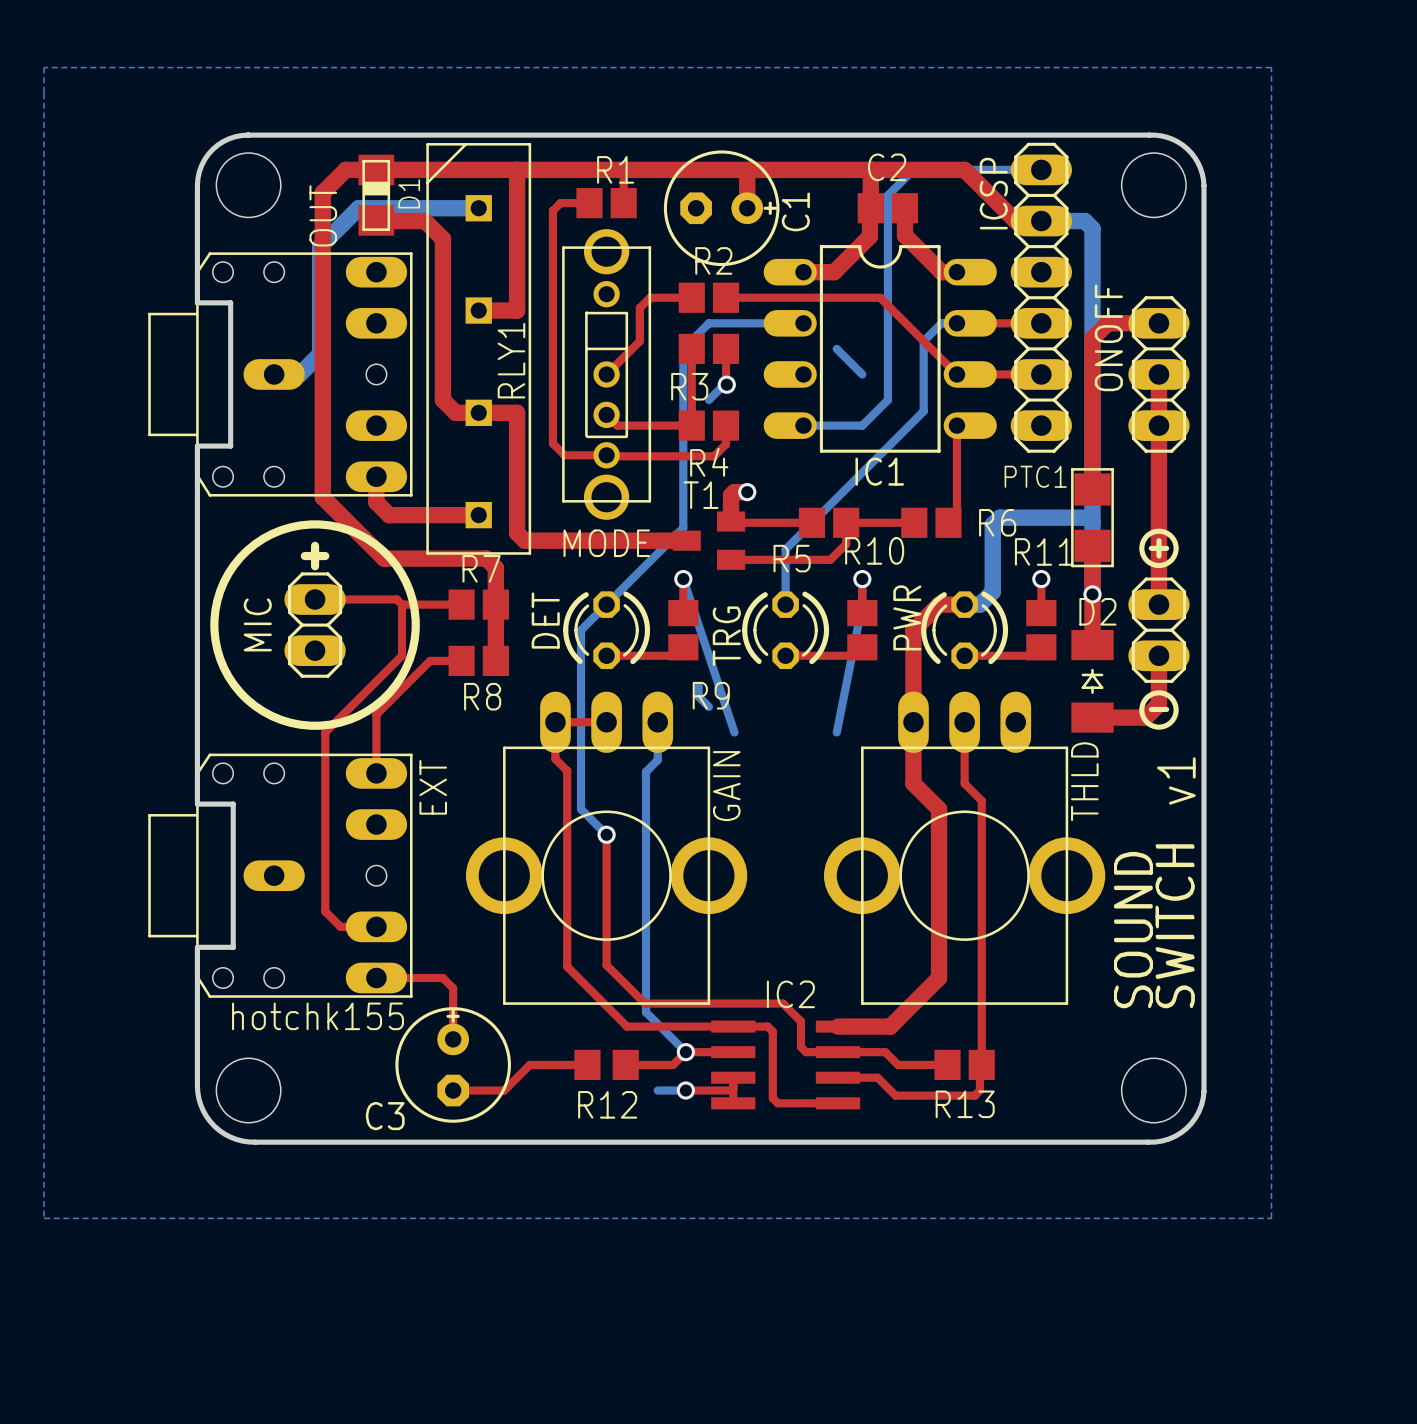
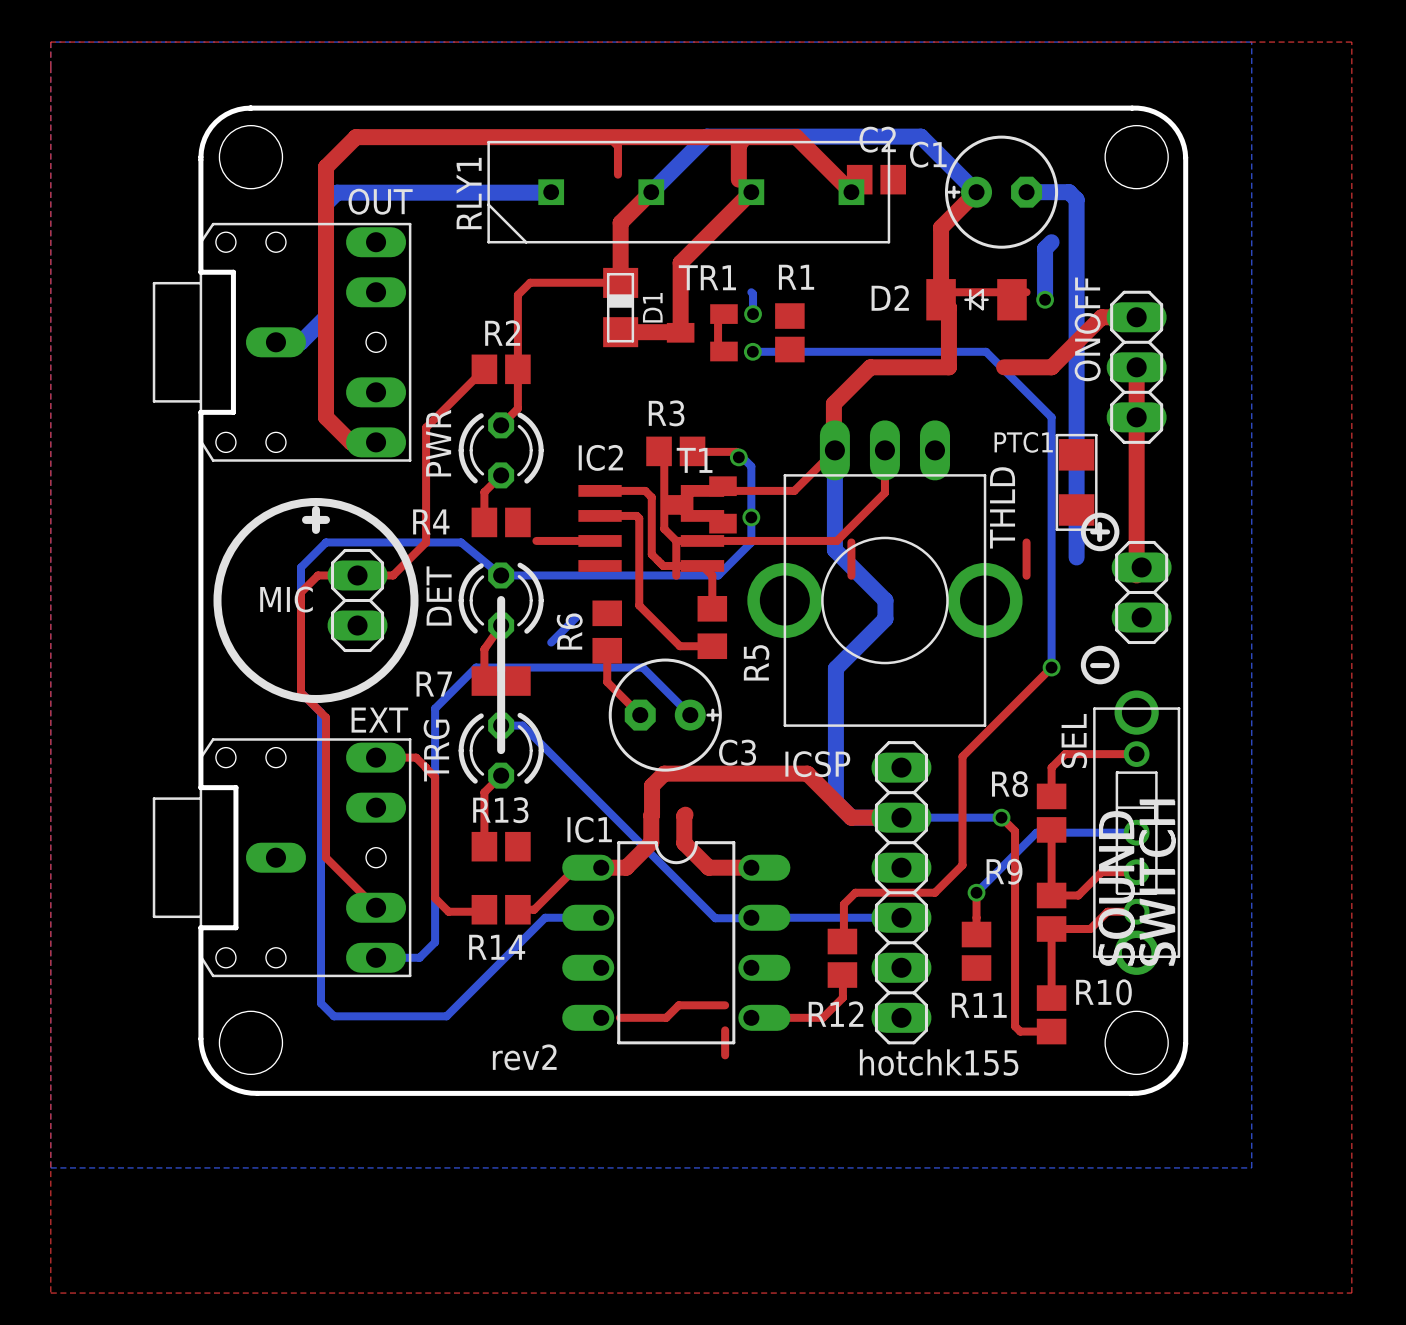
top zone outline: none -> (50, 42) (50, 1293) (1351, 1293) (1351, 42) (50, 42)
top track: (517, 169) (517, 310) (478, 310) -> none
top track: (872, 169) (870, 171) (870, 236) (834, 272) (803, 272) -> none
bottom track: (1041, 169) (913, 169) (887, 195) (887, 400) (862, 425) (803, 425) -> none
D1 position: (376, 195) -> (620, 307)
top track: (589, 203) (560, 203) (552, 210) (552, 443) (564, 455) (714, 456) (726, 444) (726, 425) -> none
R1 rotation: 0° (606, 203) -> 90° clockwise (789, 332)
R1 position: (606, 203) -> (789, 332)
bottom track: (478, 208) (358, 208) (320, 246) (320, 354) -> (551, 192) (337, 192) (326, 203) (326, 317) (321, 322)
C1 rotation: 0° (721, 208) -> 180° (1001, 192)
C1 position: (721, 208) -> (1001, 192)
top track: (905, 208) (905, 235) (941, 272) (956, 272) -> none
OUT name rotation: 0° (323, 215) -> 90° clockwise (380, 201)
top track: (376, 220) (425, 221) (442, 238) (442, 400) (455, 412) (517, 412) (517, 533) (524, 540) (686, 540) -> none
top track: none -> (651, 192) (620, 222) (620, 282)
bottom track: none -> (651, 192) (706, 136) (920, 136) (976, 192)
top track: none -> (751, 192) (680, 262) (680, 332) (620, 332)
top track: none -> (976, 192) (941, 227) (941, 299) (948, 307) (948, 367) (870, 367) (833, 403) (834, 450) (794, 490) (702, 490)
top track: (1041, 221) (1015, 221) (964, 169) (345, 169) (322, 192) (322, 497) (384, 558) (486, 558) (495, 568) (495, 660) -> none
bottom track: none -> (1051, 242) (1045, 248) (1045, 299)
top track: (691, 297) (650, 297) (639, 307) (639, 341) (606, 374) -> none
R2 position: (708, 297) -> (501, 369)
top track: (726, 297) (880, 297) (956, 374) (1041, 374) -> none
ICSP: (1041, 297) -> none
top track: none -> (620, 282) (530, 282) (517, 295) (517, 408) (501, 425)
bottom track: none -> (751, 292) (753, 293) (753, 314)
bottom track: (803, 323) (708, 323) (683, 348) (683, 527) (581, 630) (581, 809) (606, 834) -> none
bottom track: (956, 323) (941, 323) (923, 341) (923, 411) (785, 549) (785, 604) -> none
top track: (1158, 323) (1107, 323) (1092, 338) (1092, 489) -> none
via: none -> (1045, 299)
via: none -> (753, 314)
RLY1 rotation: 0° (478, 348) -> 90° counterclockwise (688, 192)
RLY1 position: (478, 348) -> (688, 192)
top track: (691, 348) (691, 425) (617, 425) (606, 414) -> none
R3 position: (708, 348) -> (675, 451)
bottom track: (836, 348) (862, 374) -> none
IC1 position: (880, 348) -> (676, 942)
top track: none -> (1136, 317) (1101, 317) (1051, 367) (1004, 367)
RLY1 name position: RLY1 (511, 360) -> RLY1 (469, 193)
TR1: none -> (702, 332)
MODE: (606, 374) -> none
top track: (1158, 374) (1158, 604) -> none
ONOFF position: (1158, 374) -> (1136, 367)
bottom track: (726, 384) (724, 384) (708, 400) -> none
via: (726, 384) -> none
bottom track: none -> (752, 351) (986, 351) (1051, 417) (1051, 667)
via: none -> (752, 351)
R3 name position: R3 (689, 386) -> R3 (666, 413)
top track: none -> (1136, 367) (1136, 575)
R4 position: (708, 425) -> (501, 522)
top track: (956, 425) (956, 514) (948, 522) -> none
R4 name position: R4 (709, 462) -> R4 (431, 521)
IC1 name position: IC1 (879, 471) -> IC1 (589, 829)
top track: (376, 476) (376, 502) (389, 515) (478, 515) -> (376, 442) (351, 442) (326, 417) (326, 167) (356, 137) (796, 137) (851, 192)
bottom track: none -> (834, 450) (834, 549) (885, 600) (885, 619) (835, 668) (835, 802) (851, 817) (1001, 817)
top track: none -> (884, 450) (884, 492) (836, 540) (676, 540) (664, 528) (664, 456) (659, 451)
top track: none -> (692, 451) (736, 451)
bottom track: none -> (736, 451) (751, 466) (751, 542) (718, 575) (501, 575) (461, 542) (326, 542) (300, 567) (300, 692) (321, 712) (321, 1003) (334, 1016) (446, 1016) (545, 917) (576, 917)
top track: (747, 492) (734, 492) (731, 495) (732, 522) (811, 522) -> none
R5 footprint: [798, 507, 860, 538] -> [697, 596, 728, 660]
R6 footprint: [901, 507, 962, 538] -> [592, 600, 623, 664]
top track: none -> (501, 475) (484, 492) (484, 522)
top track: (914, 522) (846, 522) (846, 544) (830, 559) (731, 559) -> none
R6 name position: R6 (997, 522) -> R6 (569, 631)
bottom track: (1092, 522) (1087, 517) (999, 517) (992, 524) (992, 591) (979, 604) (964, 604) -> none
top track: none -> (600, 490) (645, 490) (651, 497) (651, 554) (663, 565) (702, 565) (712, 575) (712, 608)
line: (1158, 540) (1158, 556) -> (1099, 524) (1099, 539)
top track: (1092, 545) (1092, 645) -> none
line: (1151, 548) (1166, 548) -> (1092, 531) (1107, 531)
drawing position: (1158, 548) -> (1100, 531)
R10 name position: R10 (874, 550) -> R10 (1103, 992)
top track: none -> (600, 515) (636, 515) (639, 518) (639, 605) (679, 646) (712, 646)
R11 name position: R11 (1044, 551) -> R11 (979, 1005)
via: none -> (751, 517)
R5 name position: R5 (792, 558) -> R5 (756, 662)
R7 name position: R7 (481, 568) -> R7 (434, 684)
top track: none -> (536, 540) (600, 540)
bottom track: (683, 579) (734, 732) -> none
via: (683, 579) -> none
bottom track: (862, 579) (862, 604) (836, 732) -> none
via: (862, 579) -> none
via: (1041, 579) -> none
via: (1092, 594) -> none
top track: (315, 599) (396, 599) (402, 604) -> none
top track: (402, 604) (402, 655) (325, 732) (325, 758) -> (484, 369) (426, 427) (426, 542) (393, 575) (318, 575) (300, 592) (300, 692) (326, 717)
top track: (402, 604) (461, 604) -> none
R7 position: (478, 604) -> (501, 681)
top track: (964, 604) (939, 604) (913, 630) (913, 783) (939, 809) (939, 978) (890, 1026) (837, 1026) -> none
D2 name position: D2 (1097, 611) -> D2 (890, 298)
PWR name position: PWR (907, 617) -> PWR (438, 443)
DET name position: DET (545, 620) -> DET (439, 595)
MIC name rotation: 0° (257, 624) -> 90° clockwise (286, 599)
drawing position: (315, 625) -> (316, 600)
MIC position: (315, 625) -> (357, 600)
DET position: (606, 630) -> (501, 600)
R9 position: (683, 630) -> (1051, 912)
TRG position: (785, 630) -> (501, 750)
R10 position: (862, 630) -> (1051, 1014)
PWR position: (964, 630) -> (501, 450)
R11 position: (1041, 630) -> (976, 951)
TRG name position: TRG (726, 636) -> TRG (436, 750)
line: none -> (501, 600) (501, 750)
top track: (683, 647) (683, 655) (606, 655) -> none
top track: (862, 647) (862, 655) (785, 655) -> none
top track: (1041, 647) (1041, 655) (964, 655) -> none
bottom track: none -> (576, 617) (551, 642)
top track: (1158, 655) (1158, 704) (1145, 717) (1092, 717) -> none
top track: (461, 660) (430, 660) (376, 714) (376, 773) -> none
R8 rotation: 0° (478, 660) -> 90° clockwise (1051, 813)
R8 position: (478, 660) -> (1051, 813)
top track: none -> (501, 625) (484, 649) (484, 681)
D2 rotation: 0° (1092, 681) -> 90° clockwise (976, 299)
D2 position: (1092, 681) -> (976, 299)
bottom track: (698, 686) (698, 696) (708, 706) -> none
top track: none -> (607, 650) (607, 682) (640, 715)
R9 name position: R9 (711, 695) -> R9 (1004, 871)
top track: none -> (1051, 667) (962, 756) (962, 865) (934, 892) (855, 892) (843, 904) (842, 941)
via: none -> (1051, 667)
line: (1151, 709) (1166, 709) -> (1092, 665) (1107, 665)
drawing position: (1158, 709) -> (1100, 665)
top track: (606, 722) (555, 722) (555, 759) (567, 770) (567, 966) (627, 1026) (767, 1026) (772, 1031) (772, 1098) (777, 1103) (837, 1103) -> none
bottom track: (657, 722) (657, 760) (645, 771) (645, 1012) (685, 1052) -> none
top track: (964, 722) (964, 783) (981, 800) (981, 1064) (979, 1066) (979, 1090) (974, 1095) (895, 1095) (877, 1077) (837, 1077) -> none
bottom track: none -> (690, 715) (642, 667) (476, 667) (435, 708) (435, 942) (419, 957) (376, 957)
bottom track: none -> (501, 725) (522, 725) (715, 918) (901, 917)
text: v1 (1176, 780) -> none
EXT name rotation: 0° (433, 787) -> 90° clockwise (379, 720)
top track: none -> (1136, 754) (1065, 754) (1051, 767) (1051, 796)
top track: none -> (376, 757) (416, 757) (435, 777) (435, 898) (448, 911) (482, 911) (484, 909)
board edge: (197, 804) (233, 804) (233, 829) -> (200, 762) (200, 787) (235, 787)
top track: none -> (501, 775) (484, 792) (484, 846)
top track: (606, 834) (606, 965) (644, 1003) (783, 1003) (800, 1021) (800, 1047) (806, 1052) (885, 1052) (898, 1064) (947, 1064) -> none
via: (606, 834) -> none
GAIN: (606, 848) -> none
THLD position: (964, 848) -> (884, 573)
top track: none -> (684, 815) (684, 843) (708, 867) (751, 867)
top track: none -> (901, 817) (851, 817) (807, 773) (664, 773) (652, 785) (651, 842) (626, 867) (576, 867) (534, 909) (517, 909)
top track: none -> (1001, 817) (1015, 831) (1015, 1026) (1020, 1031) (1051, 1031)
via: none -> (1001, 817)
top track: none -> (1051, 829) (1051, 895) (1078, 895) (1101, 872) (1136, 872)
EXT position: (280, 875) -> (282, 857)
bottom track: none -> (1136, 832) (1036, 832) (976, 892)
SEL: none -> (1136, 832)
top track: (325, 901) (325, 911) (340, 926) (376, 926) -> (326, 857) (376, 907)
ICSP: none -> (901, 892)
top track: none -> (976, 892) (976, 934)
via: none -> (976, 892)
board edge: (233, 947) (197, 947) (197, 972) -> (235, 902) (235, 927) (200, 927)
R14: none -> (501, 909)
top track: none -> (1136, 911) (1107, 911) (1090, 928) (1051, 928) (1051, 998)
top track: (376, 978) (442, 978) (453, 988) (453, 1039) -> none
IC2 name position: IC2 (790, 994) -> IC2 (600, 457)
text: hotchk155 (318, 1016) -> none
top track: none -> (842, 975) (842, 997) (822, 1017) (751, 1017)
R12 footprint: [574, 1049, 639, 1081] -> [827, 928, 858, 988]
via: (685, 1052) -> none
C3 rotation: 0° (453, 1064) -> 90° clockwise (665, 715)
C3 position: (453, 1064) -> (665, 715)
top track: (587, 1064) (529, 1064) (504, 1090) (453, 1090) -> none
IC2 position: (785, 1064) -> (651, 528)
R13 position: (964, 1064) -> (501, 846)
top track: (733, 1089) (685, 1090) -> none
bottom track: (657, 1090) (685, 1090) -> none
via: (685, 1090) -> none
R13 name position: R13 (965, 1104) -> R13 (500, 810)
text: none -> rev2 (524, 1057)
text: none -> hotchk155 (939, 1062)
C3 name position: C3 (385, 1116) -> C3 (737, 752)

